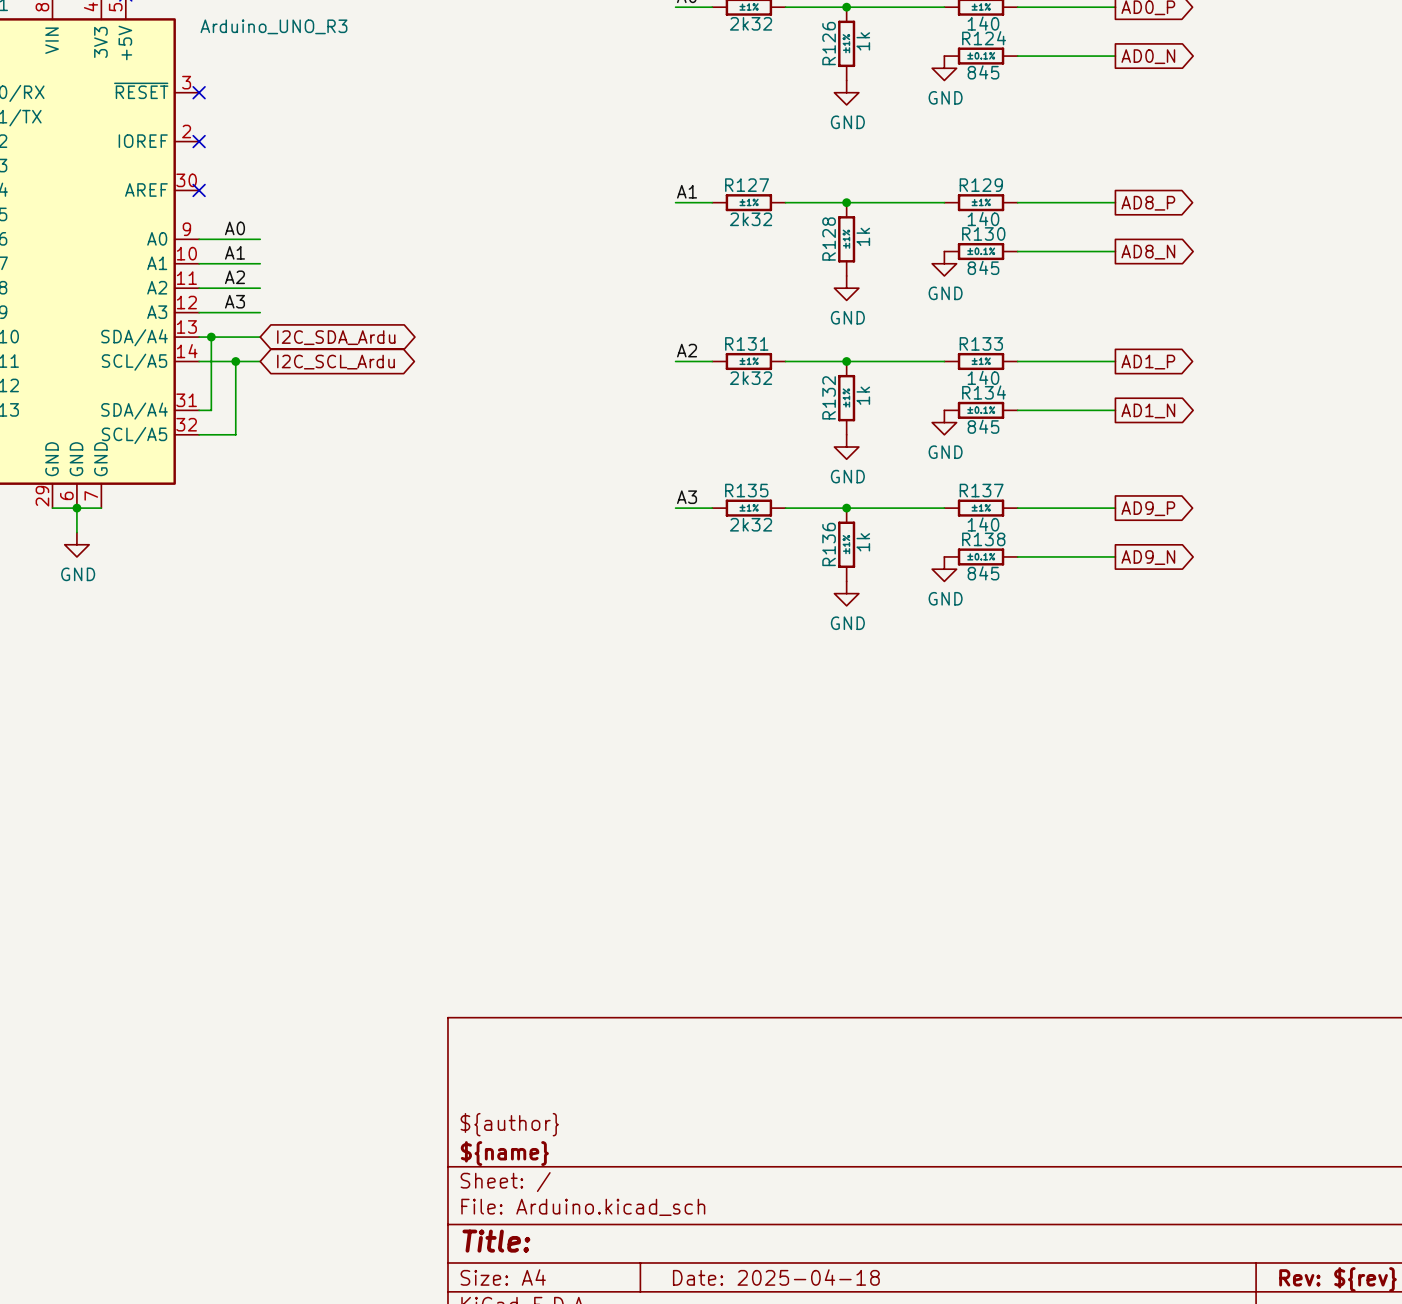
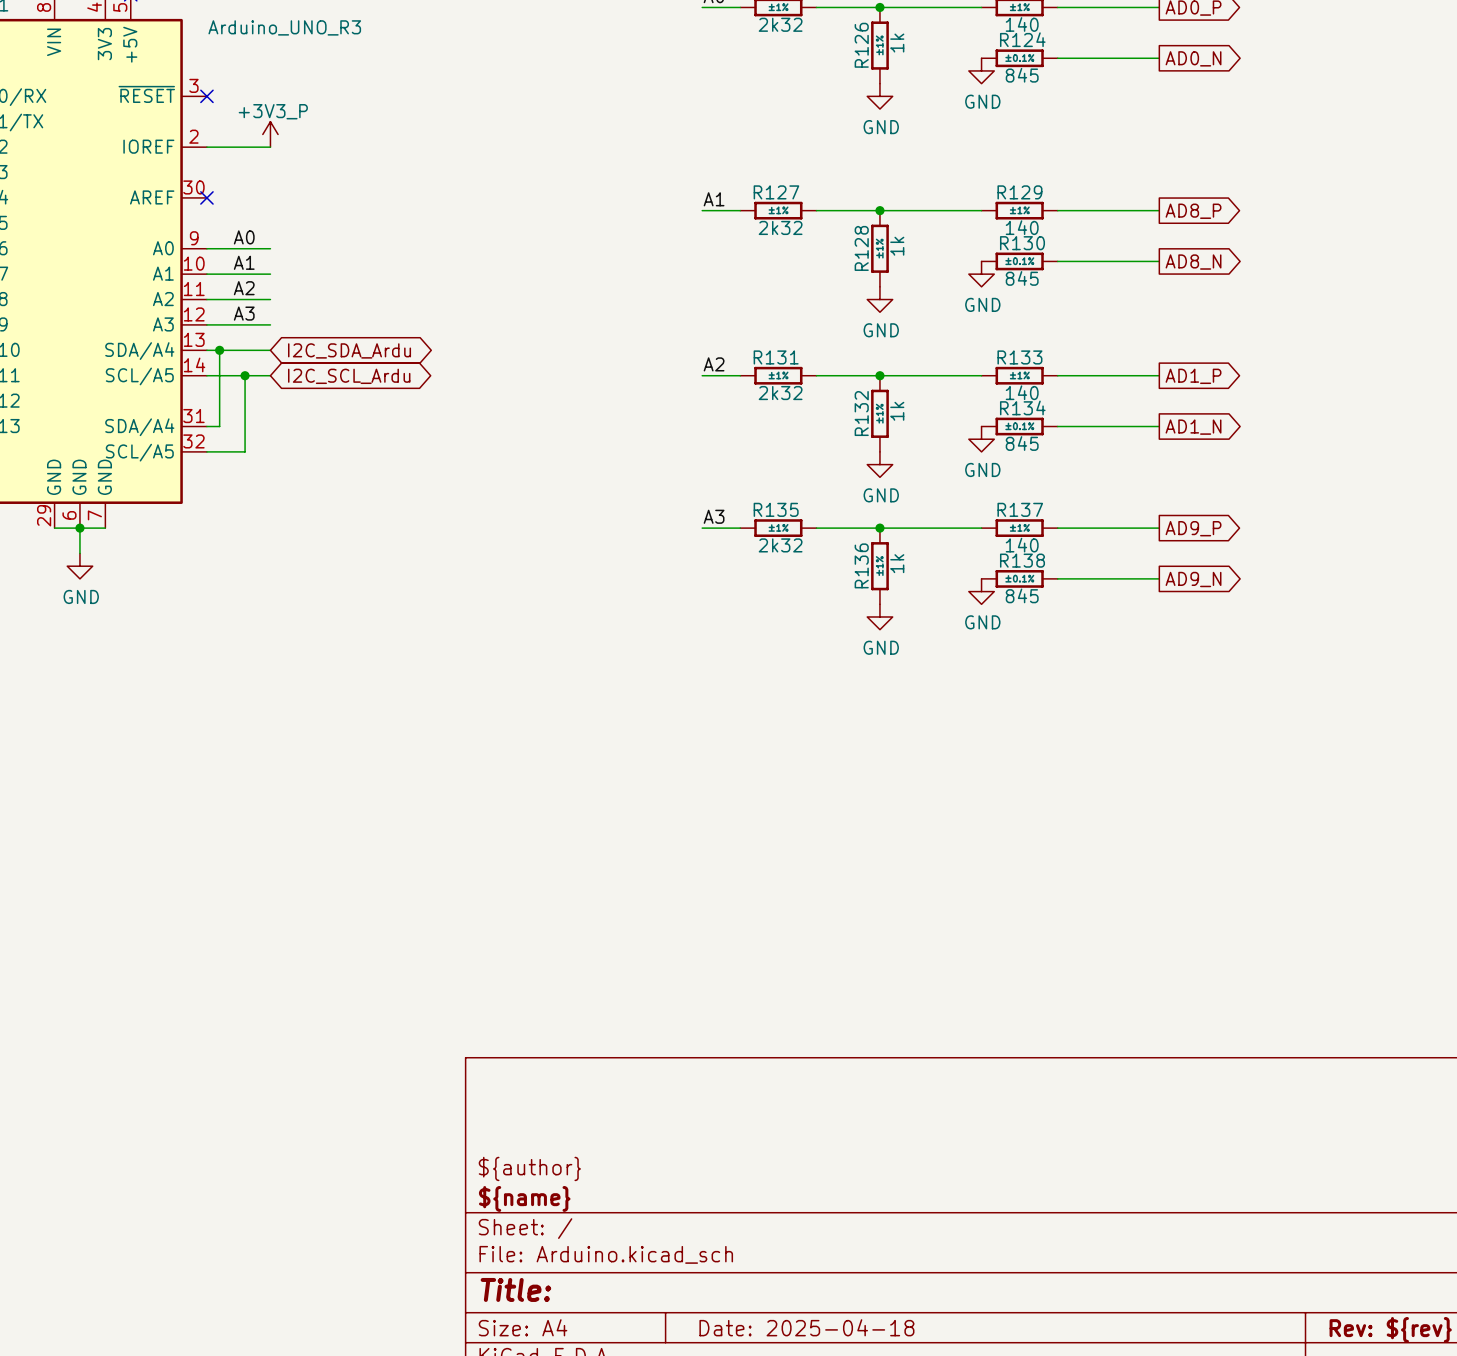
power symbol: none -> +3V3_P (270, 134)
wire: none -> (206, 147) (270, 147)
no-connect mark: (199, 141) -> none

